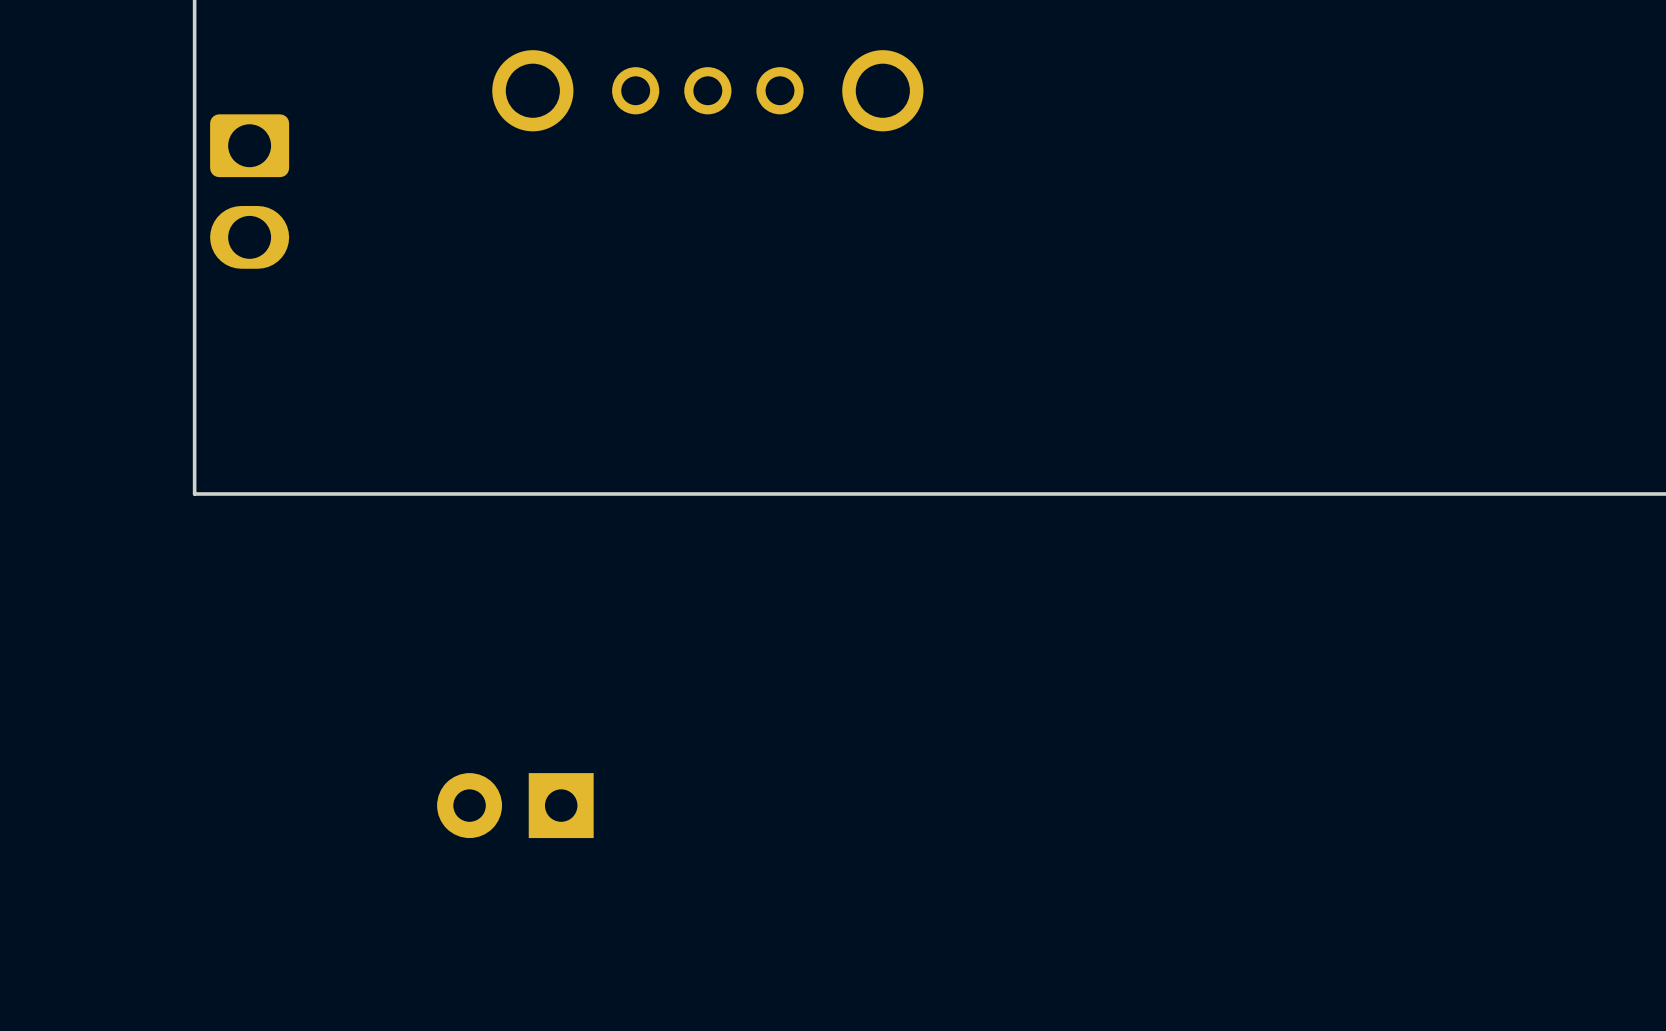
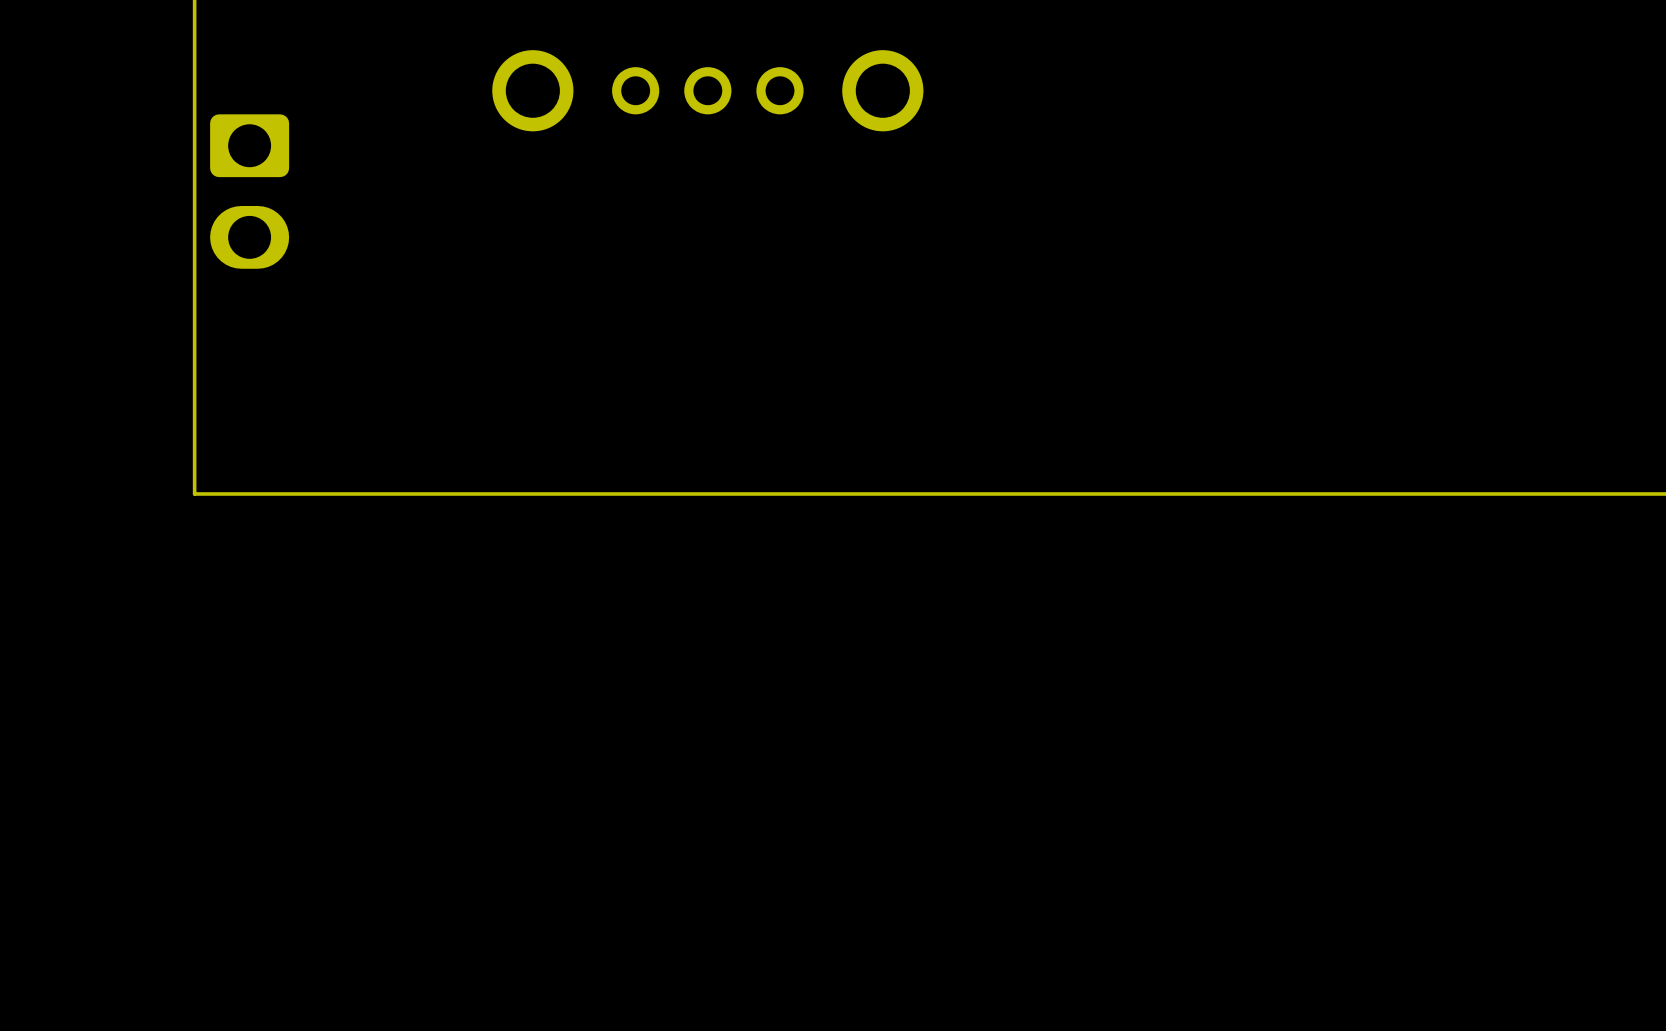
part: (515, 805) -> none

